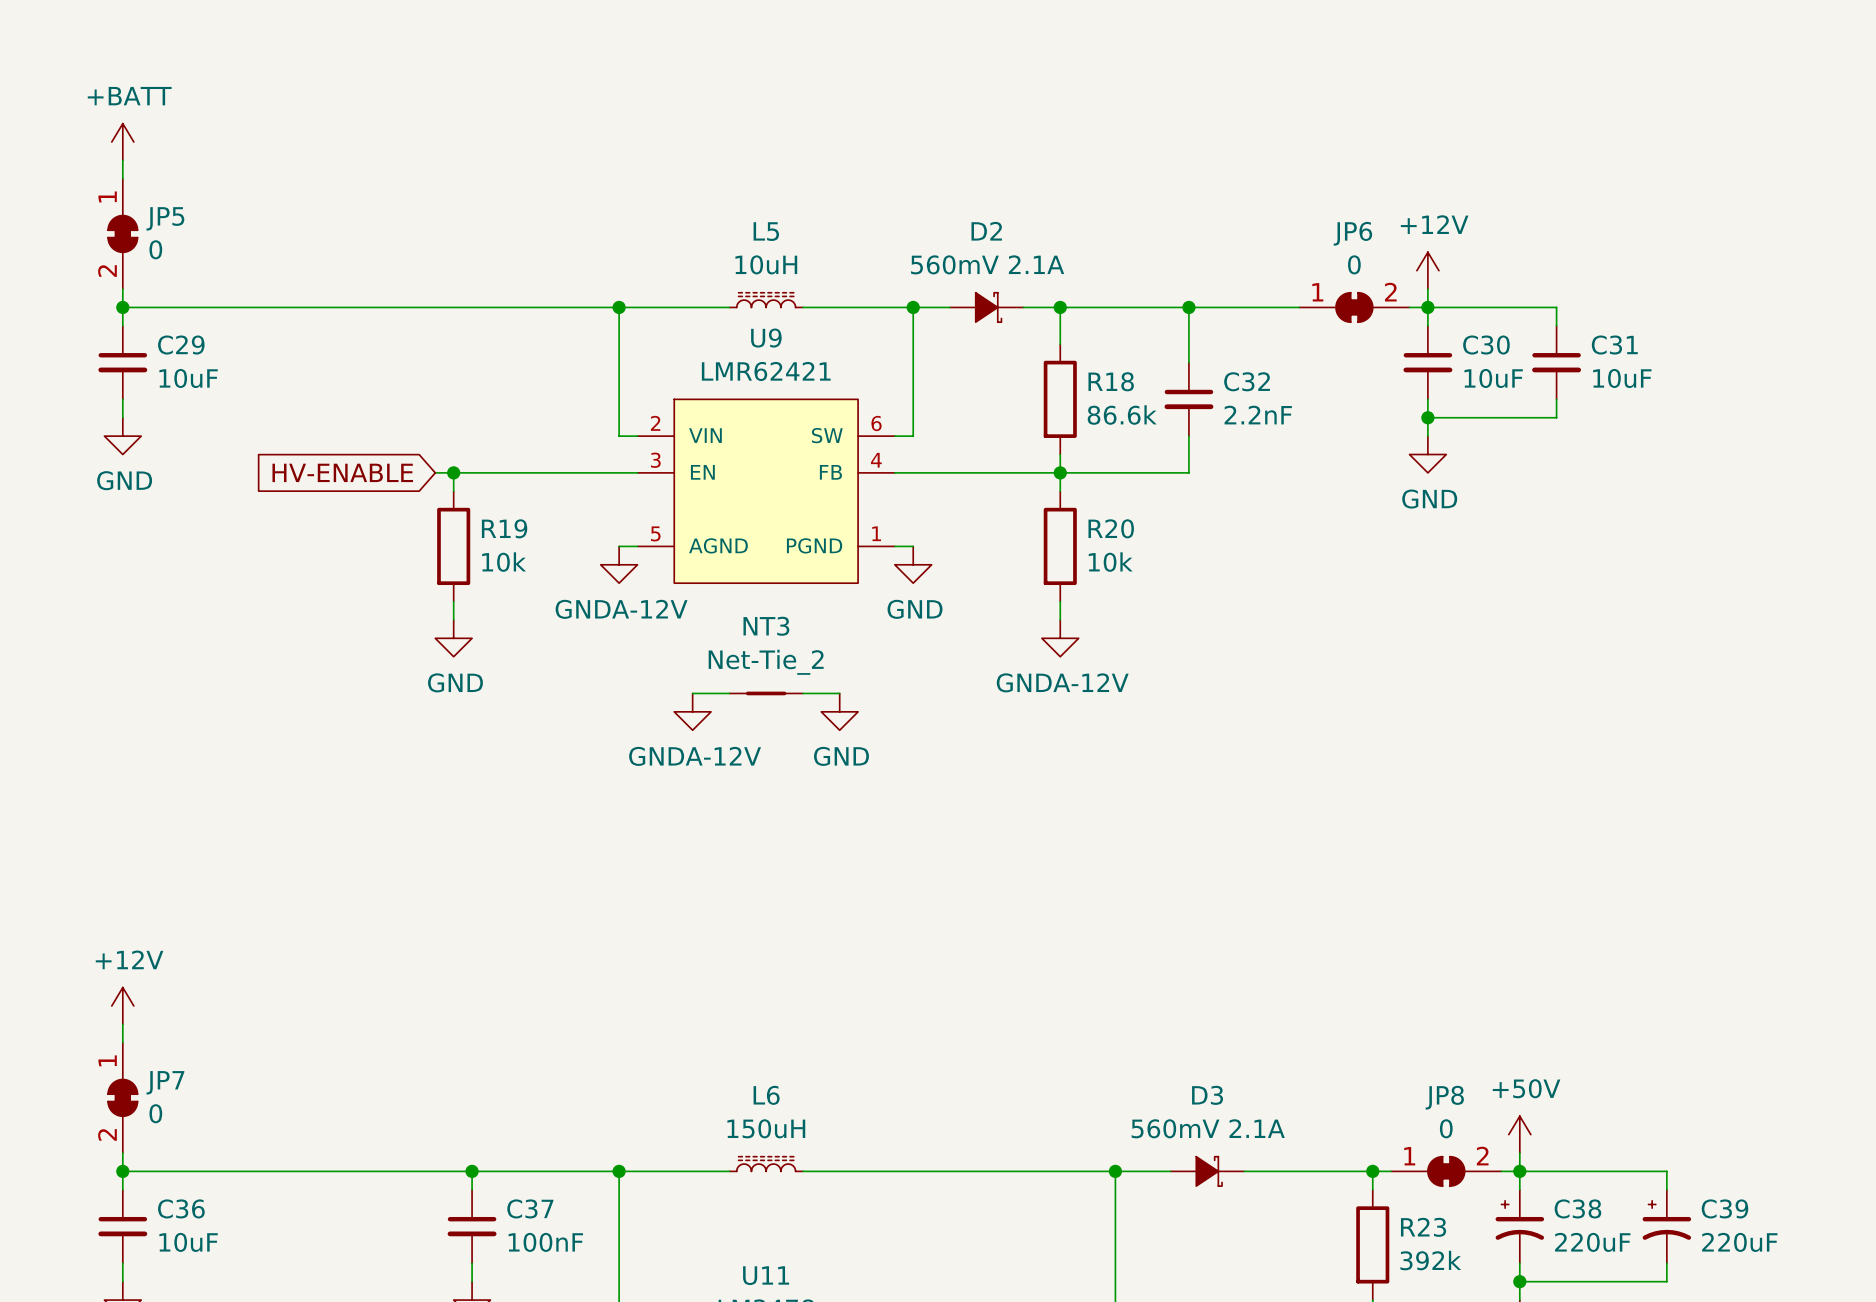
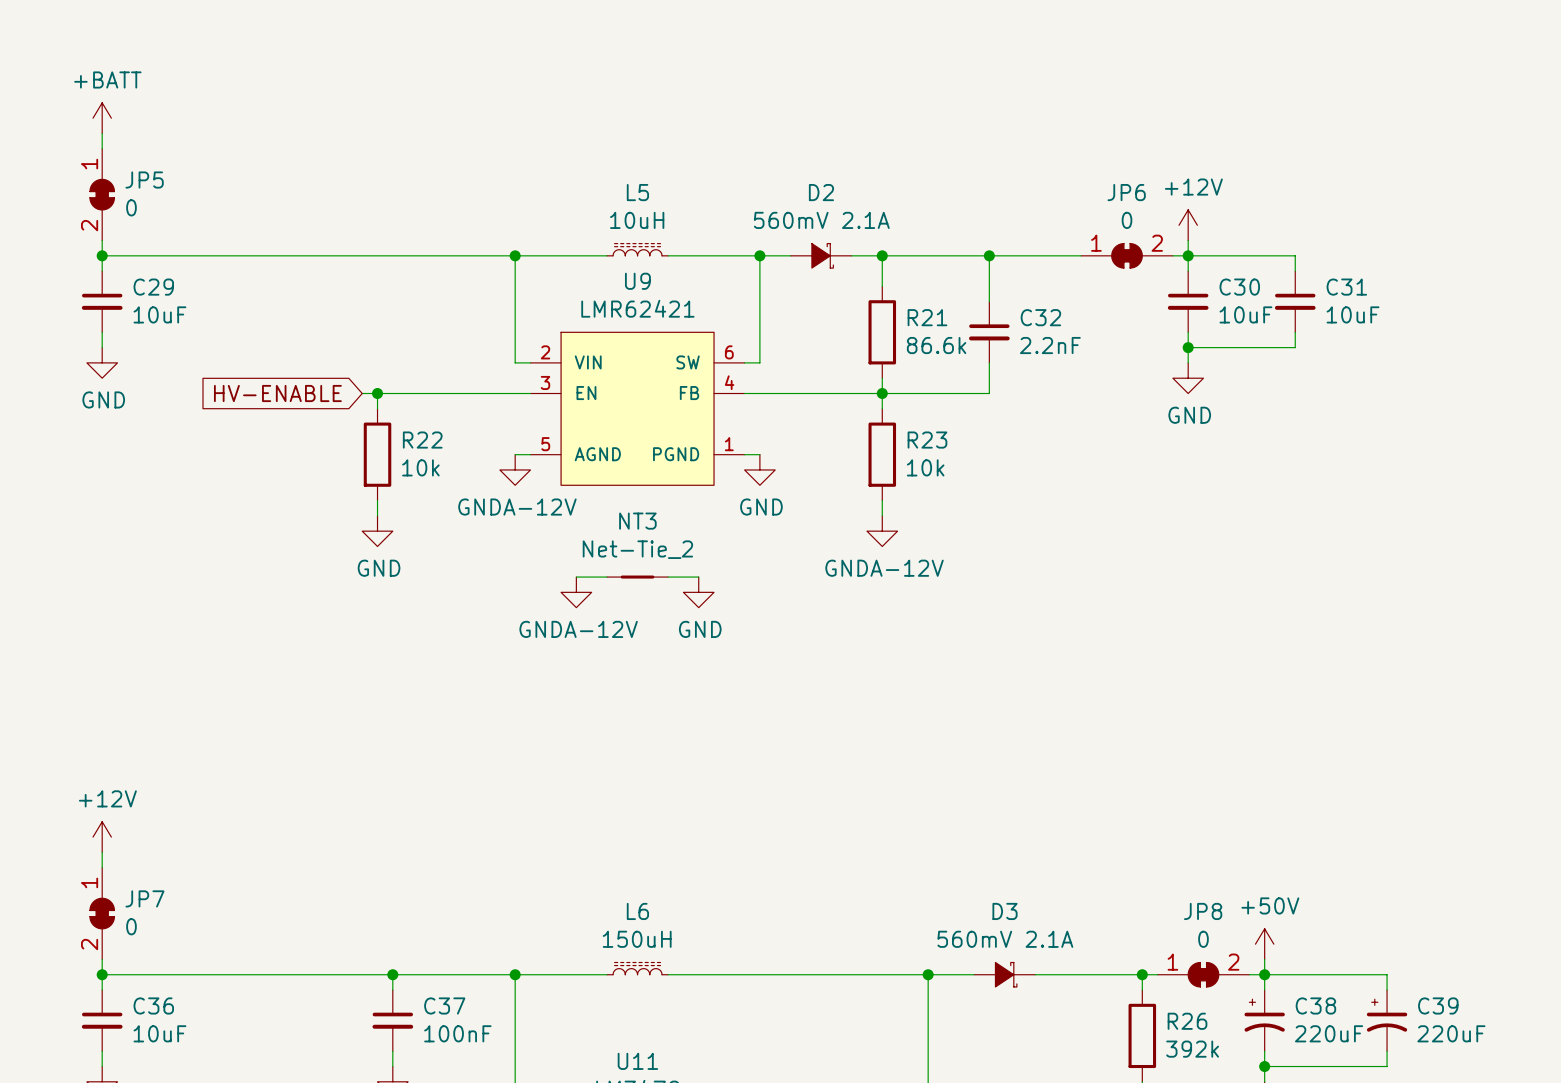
R18 name: R18 (1111, 381) -> R21 (927, 317)
R19 name: R19 (504, 528) -> R22 (422, 440)
R20 name: R20 (1111, 528) -> R23 (927, 440)
R23 name: R23 (1423, 1227) -> R26 (1187, 1021)

